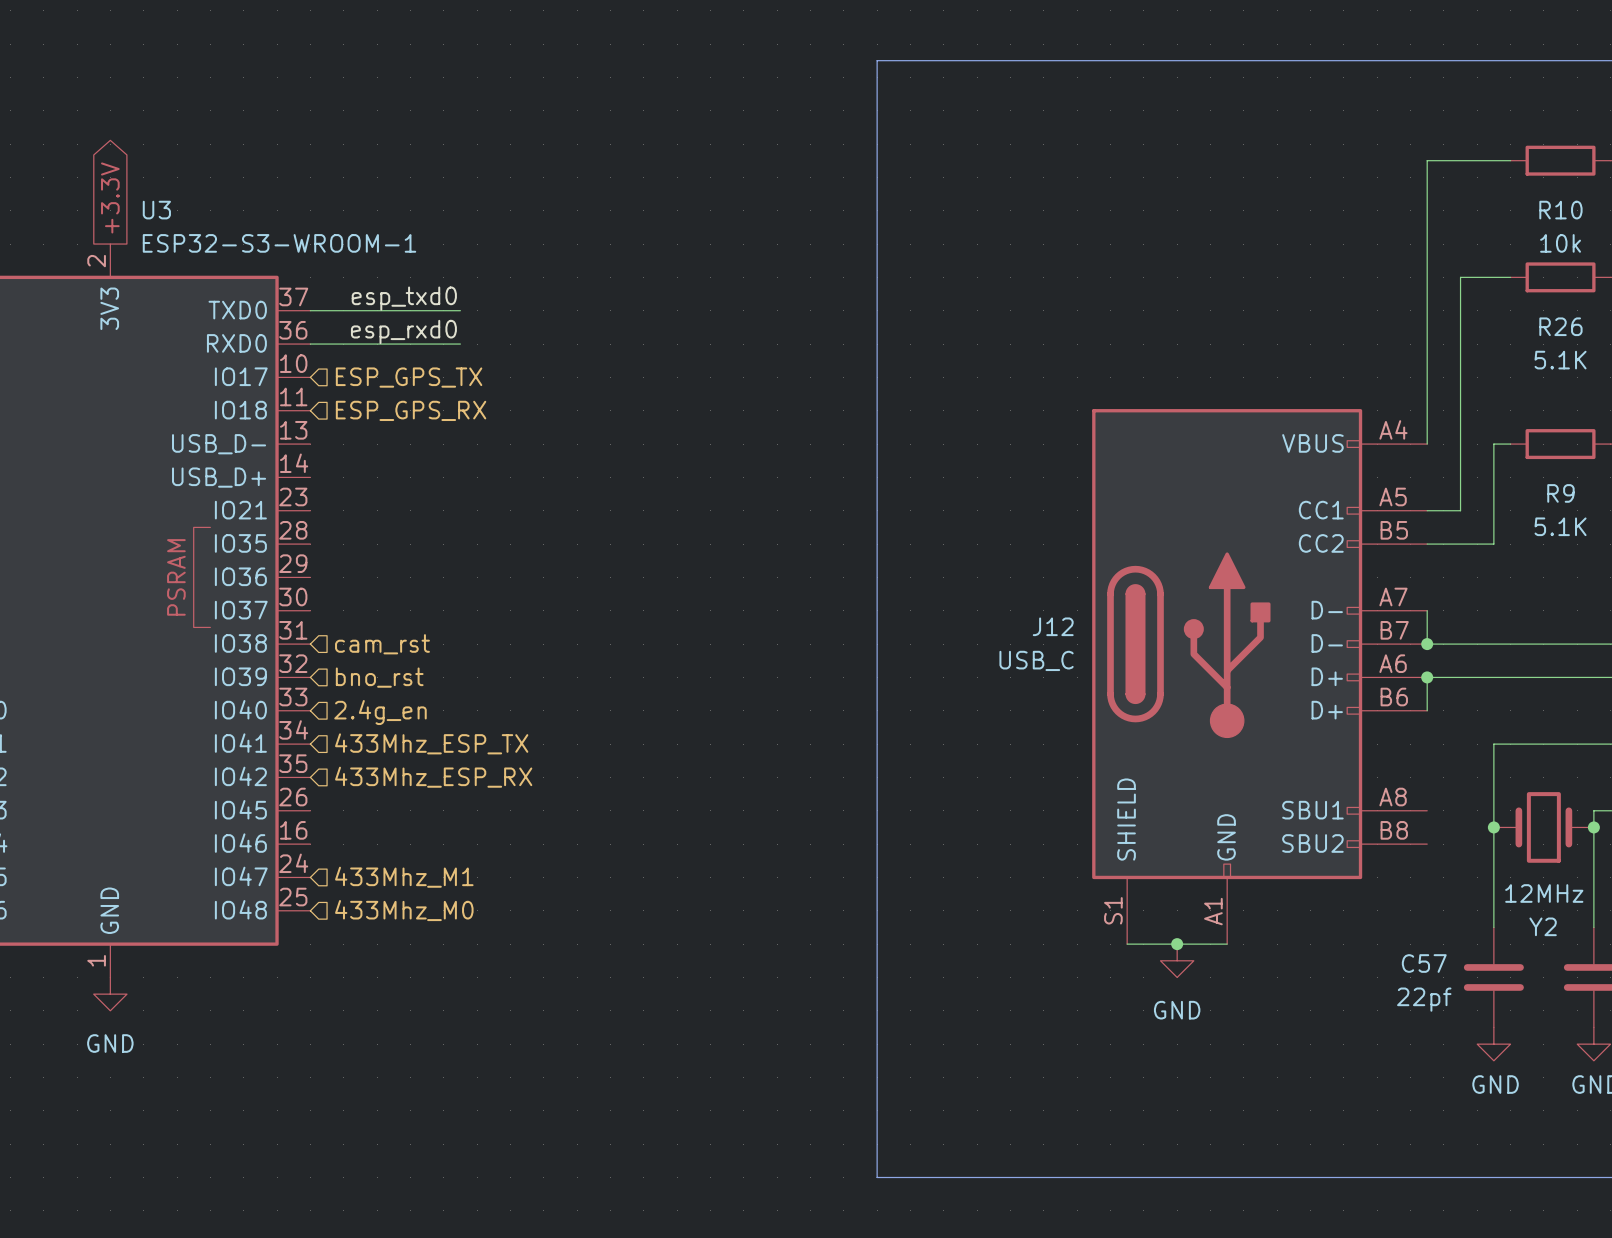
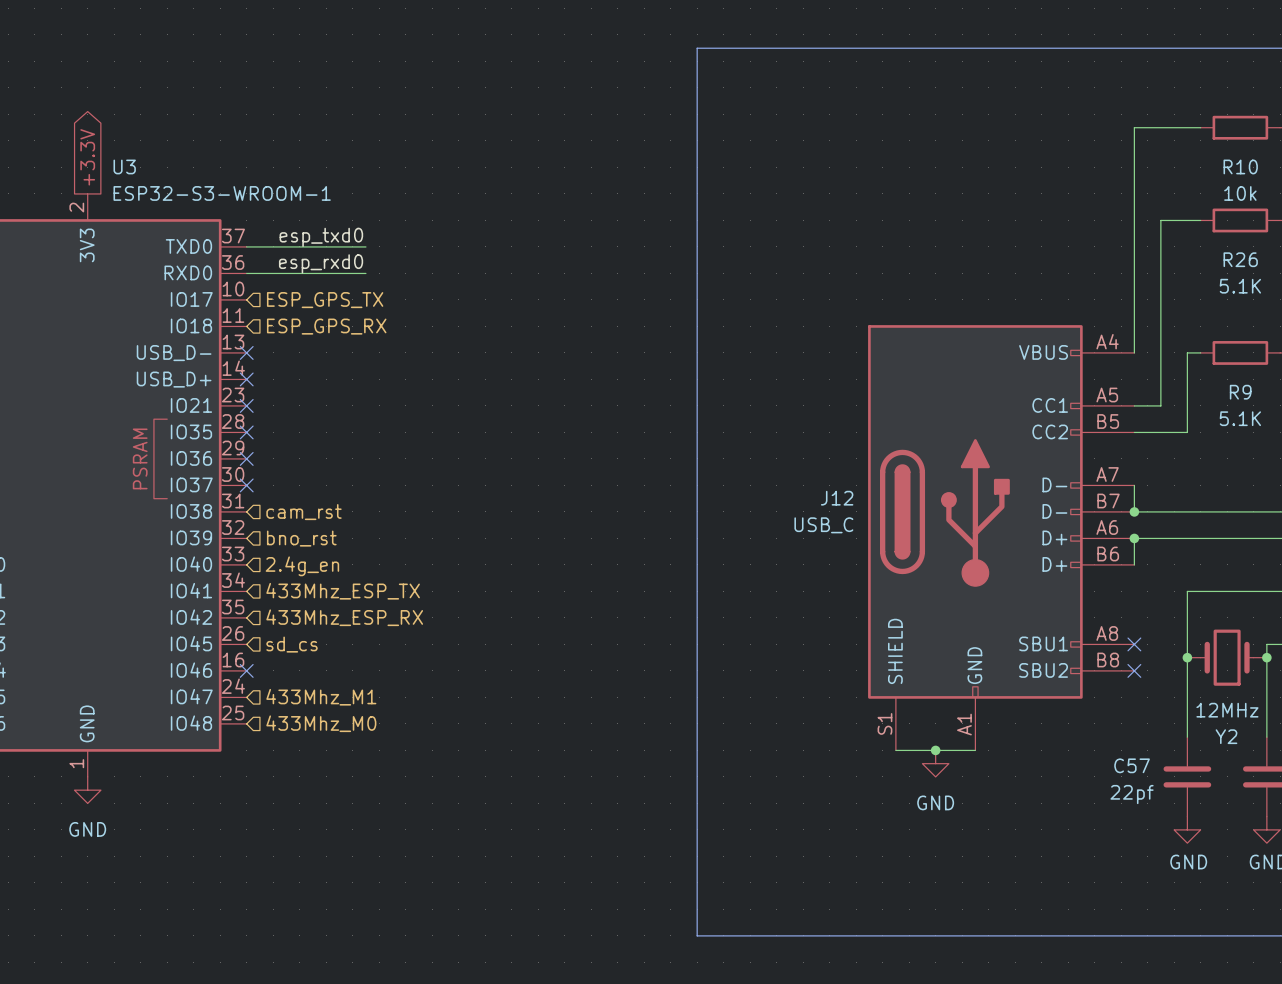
no-connect mark: none -> (246, 352)
no-connect mark: none -> (246, 379)
no-connect mark: none -> (246, 405)
no-connect mark: none -> (246, 432)
no-connect mark: none -> (246, 458)
no-connect mark: none -> (246, 485)
hierarchical label: none -> sd_cs (292, 644)
no-connect mark: none -> (1134, 644)
no-connect mark: none -> (246, 670)
no-connect mark: none -> (1134, 670)

